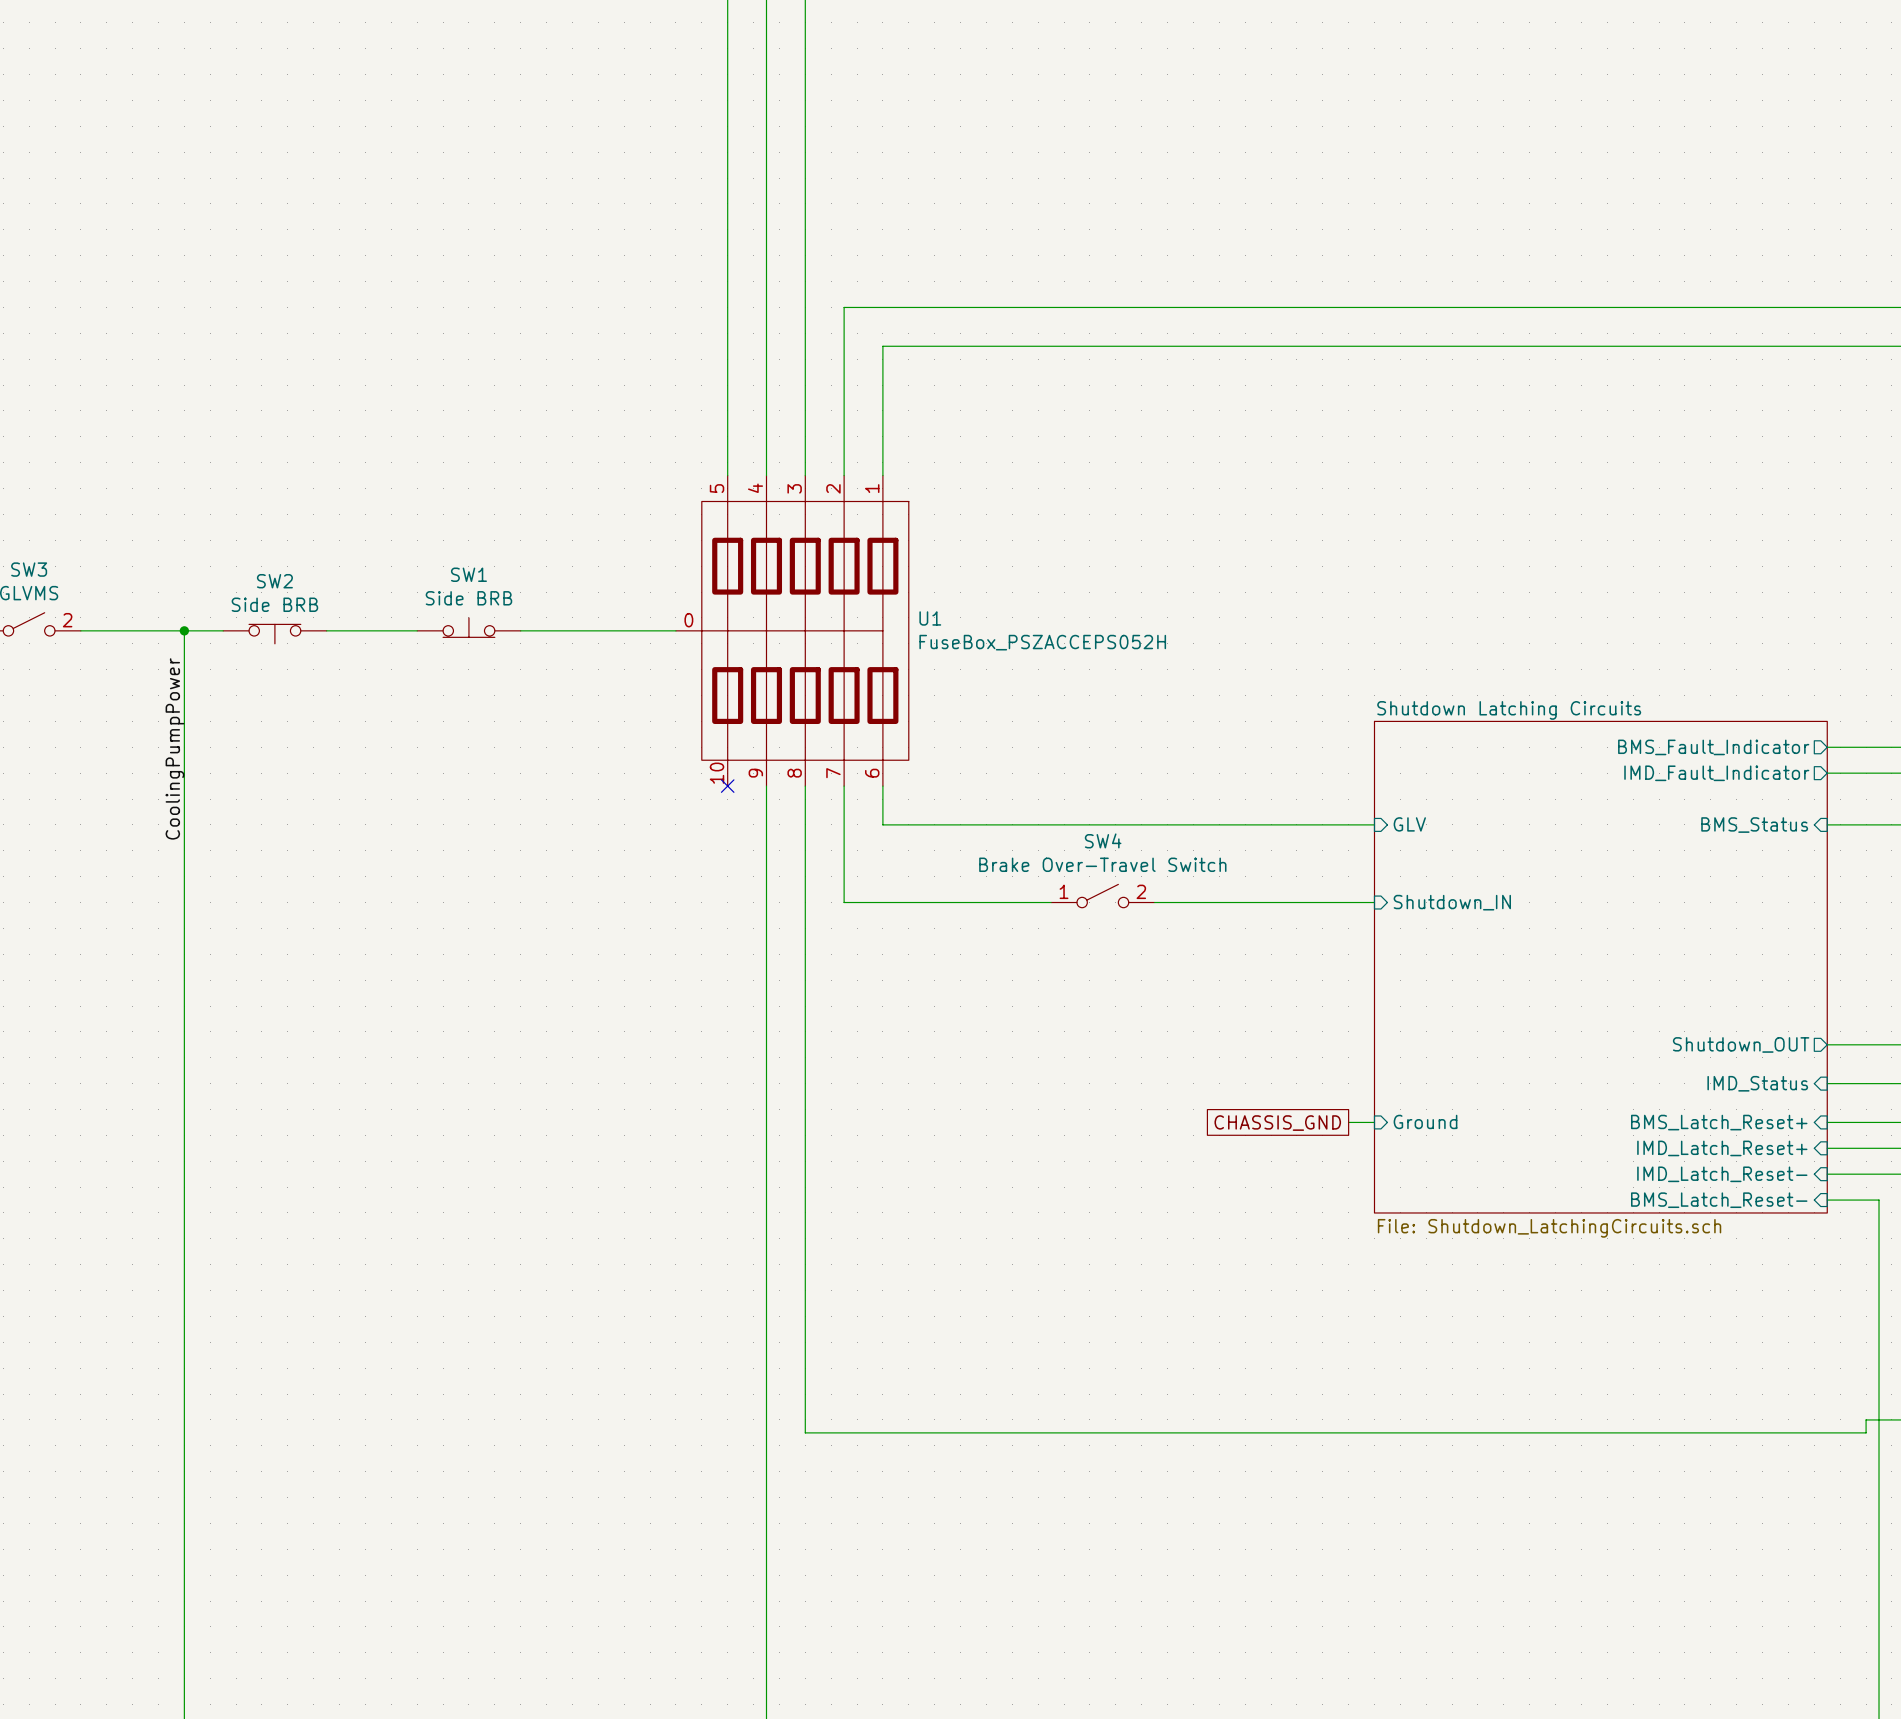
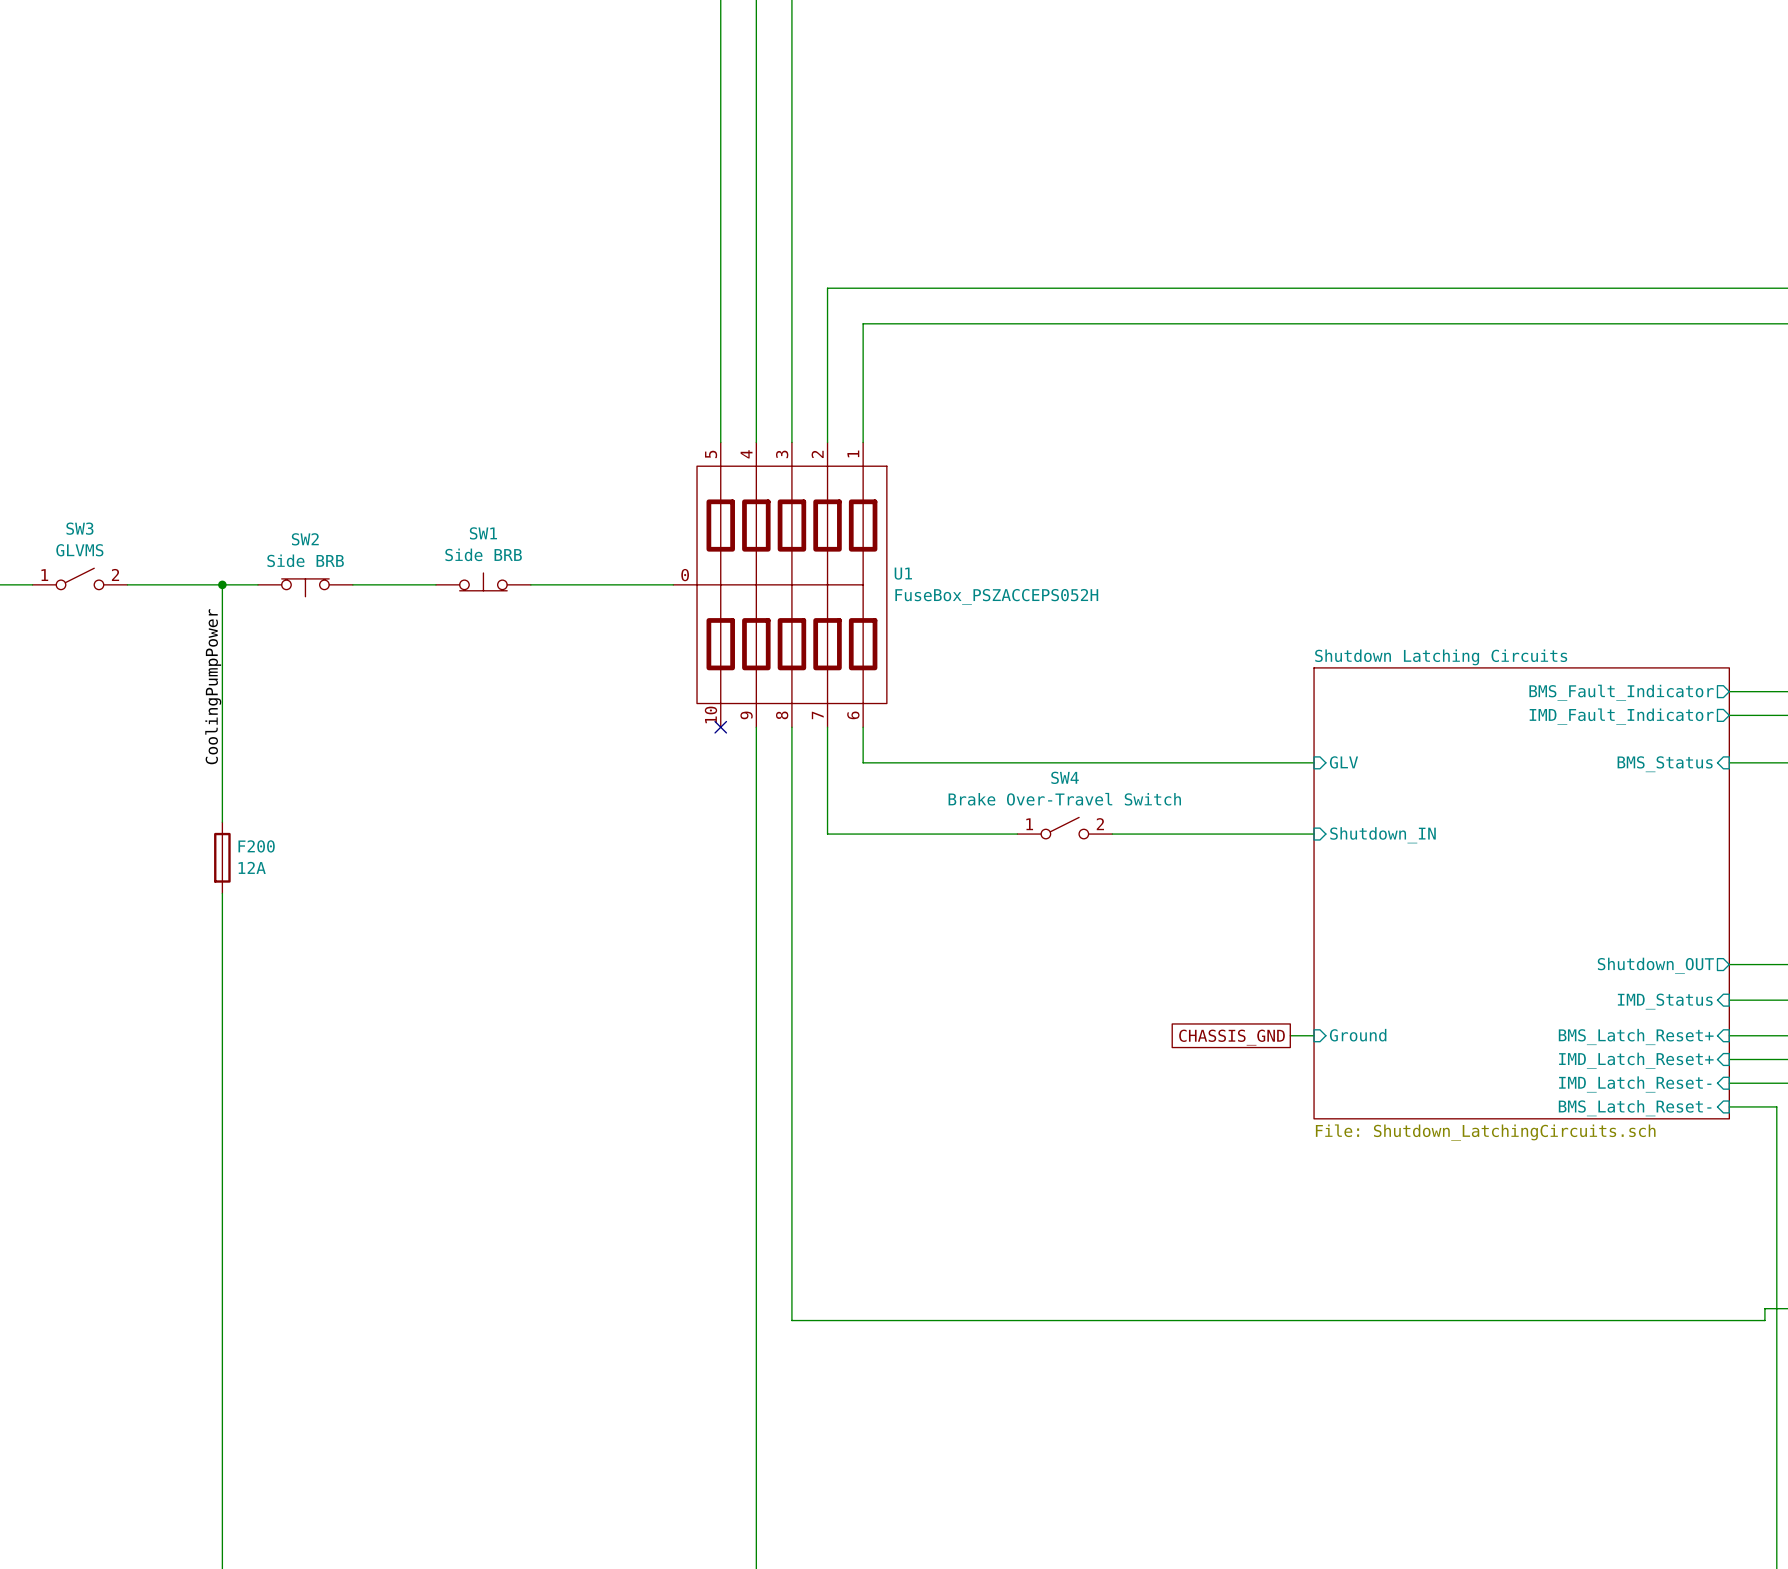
F200: none -> 12A (222, 857)

